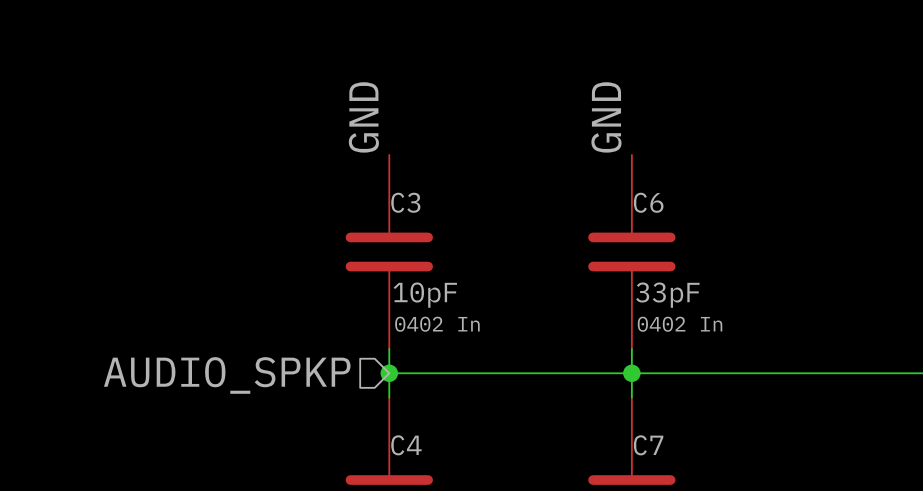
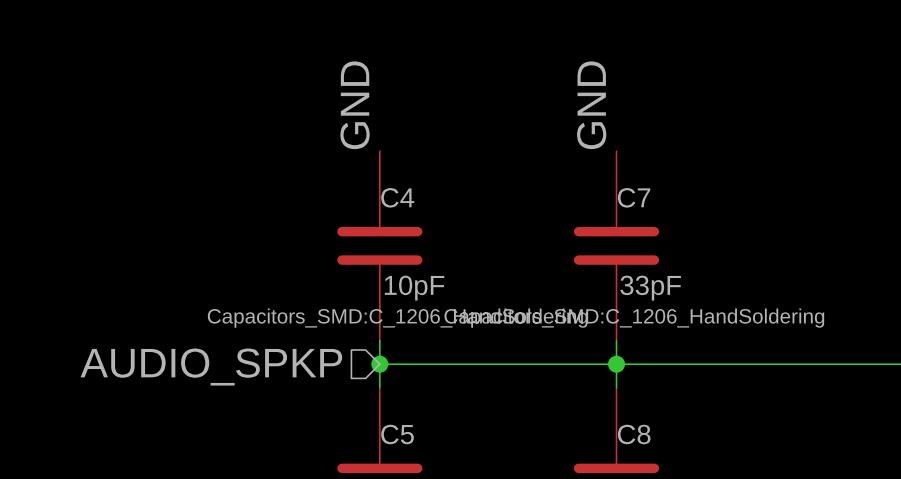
C3 name: C3 (405, 202) -> C4 (397, 197)
C6 name: C6 (648, 202) -> C7 (634, 197)
C3 text: 0402 In (437, 324) -> none
C6 text: 0402 In (680, 324) -> none
C3 text: none -> Capacitors_SMD:C_1206_HandSoldering (397, 318)
C6 text: none -> Capacitors_SMD:C_1206_HandSoldering (634, 318)
C4 name: C4 (406, 445) -> C5 (397, 434)
C7 name: C7 (648, 445) -> C8 (634, 434)

